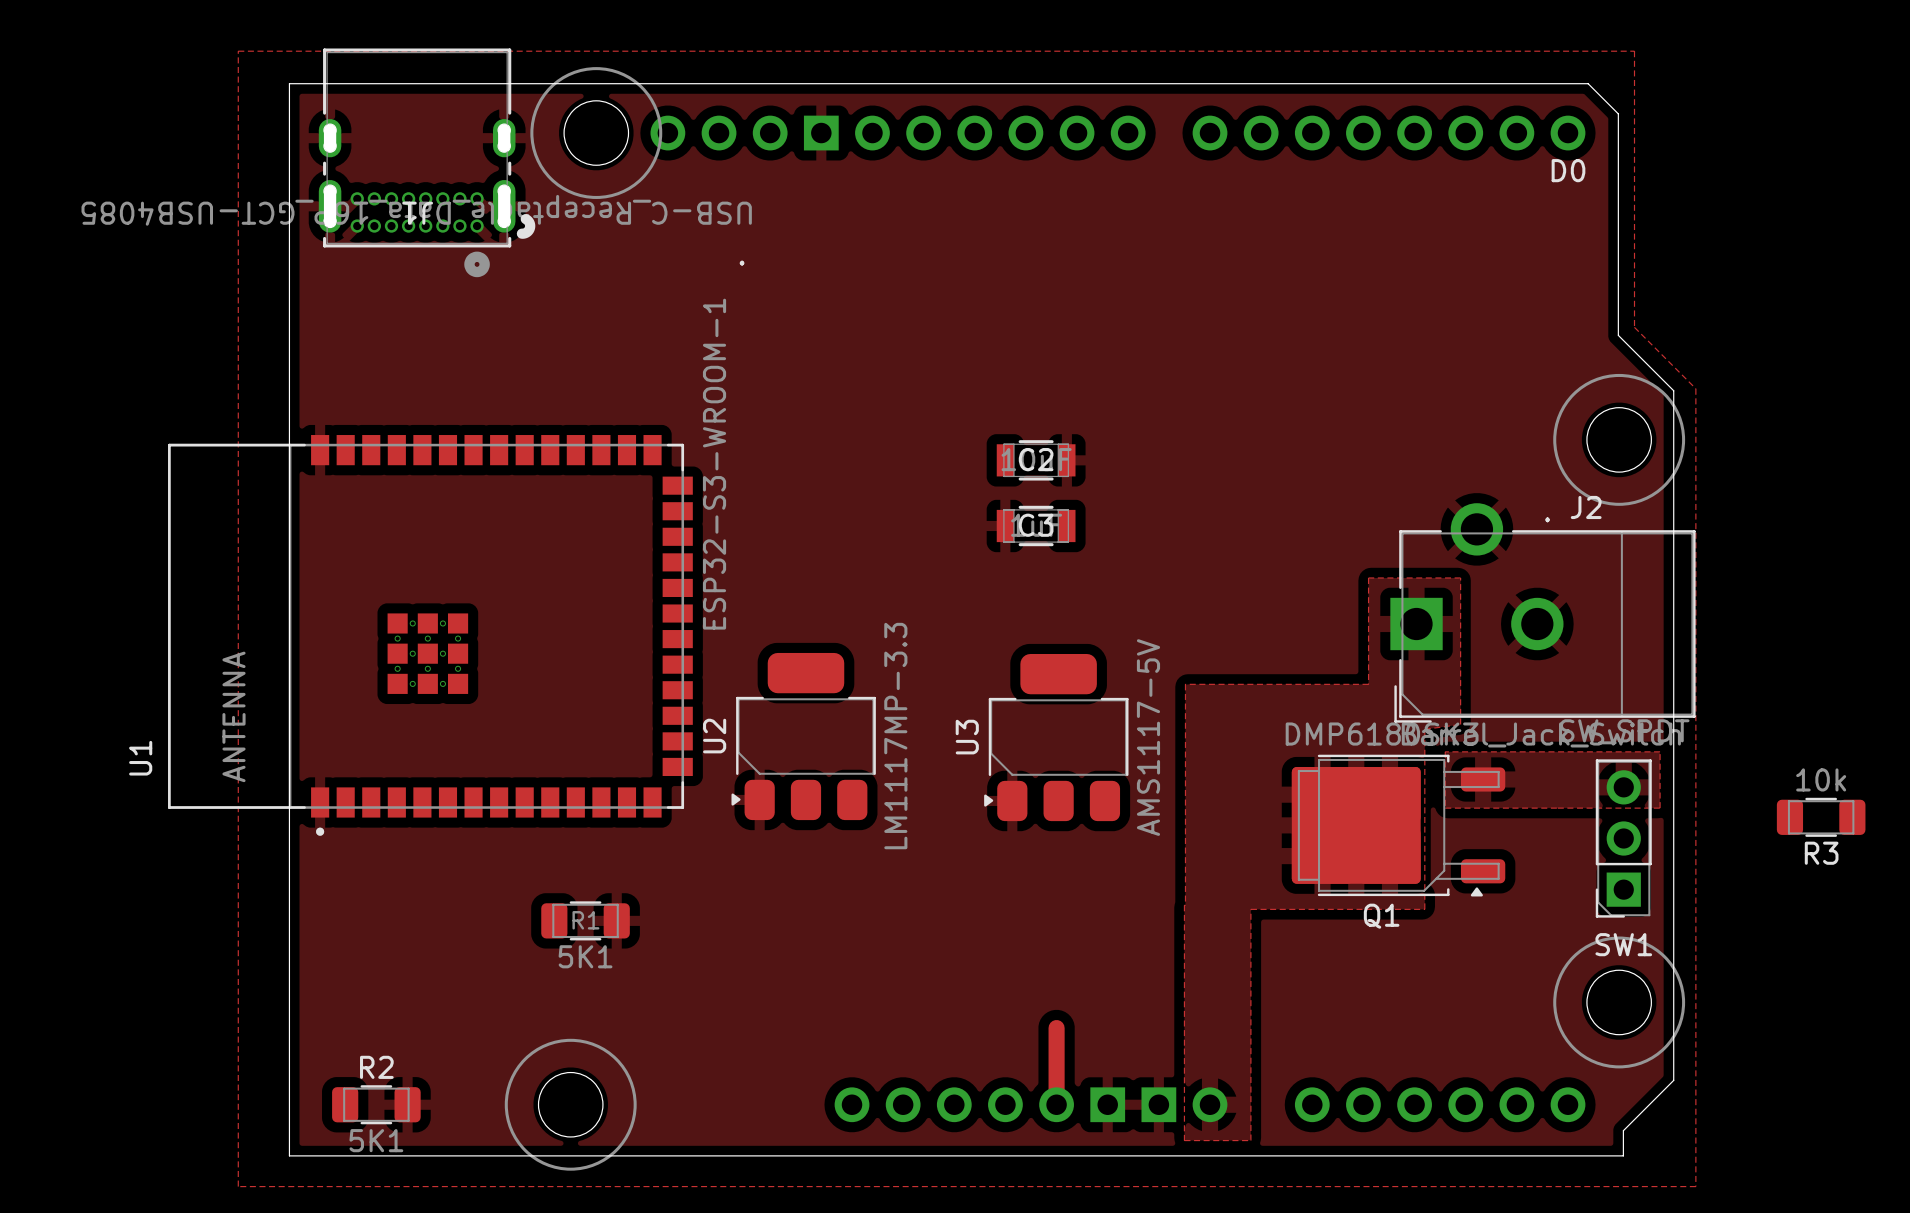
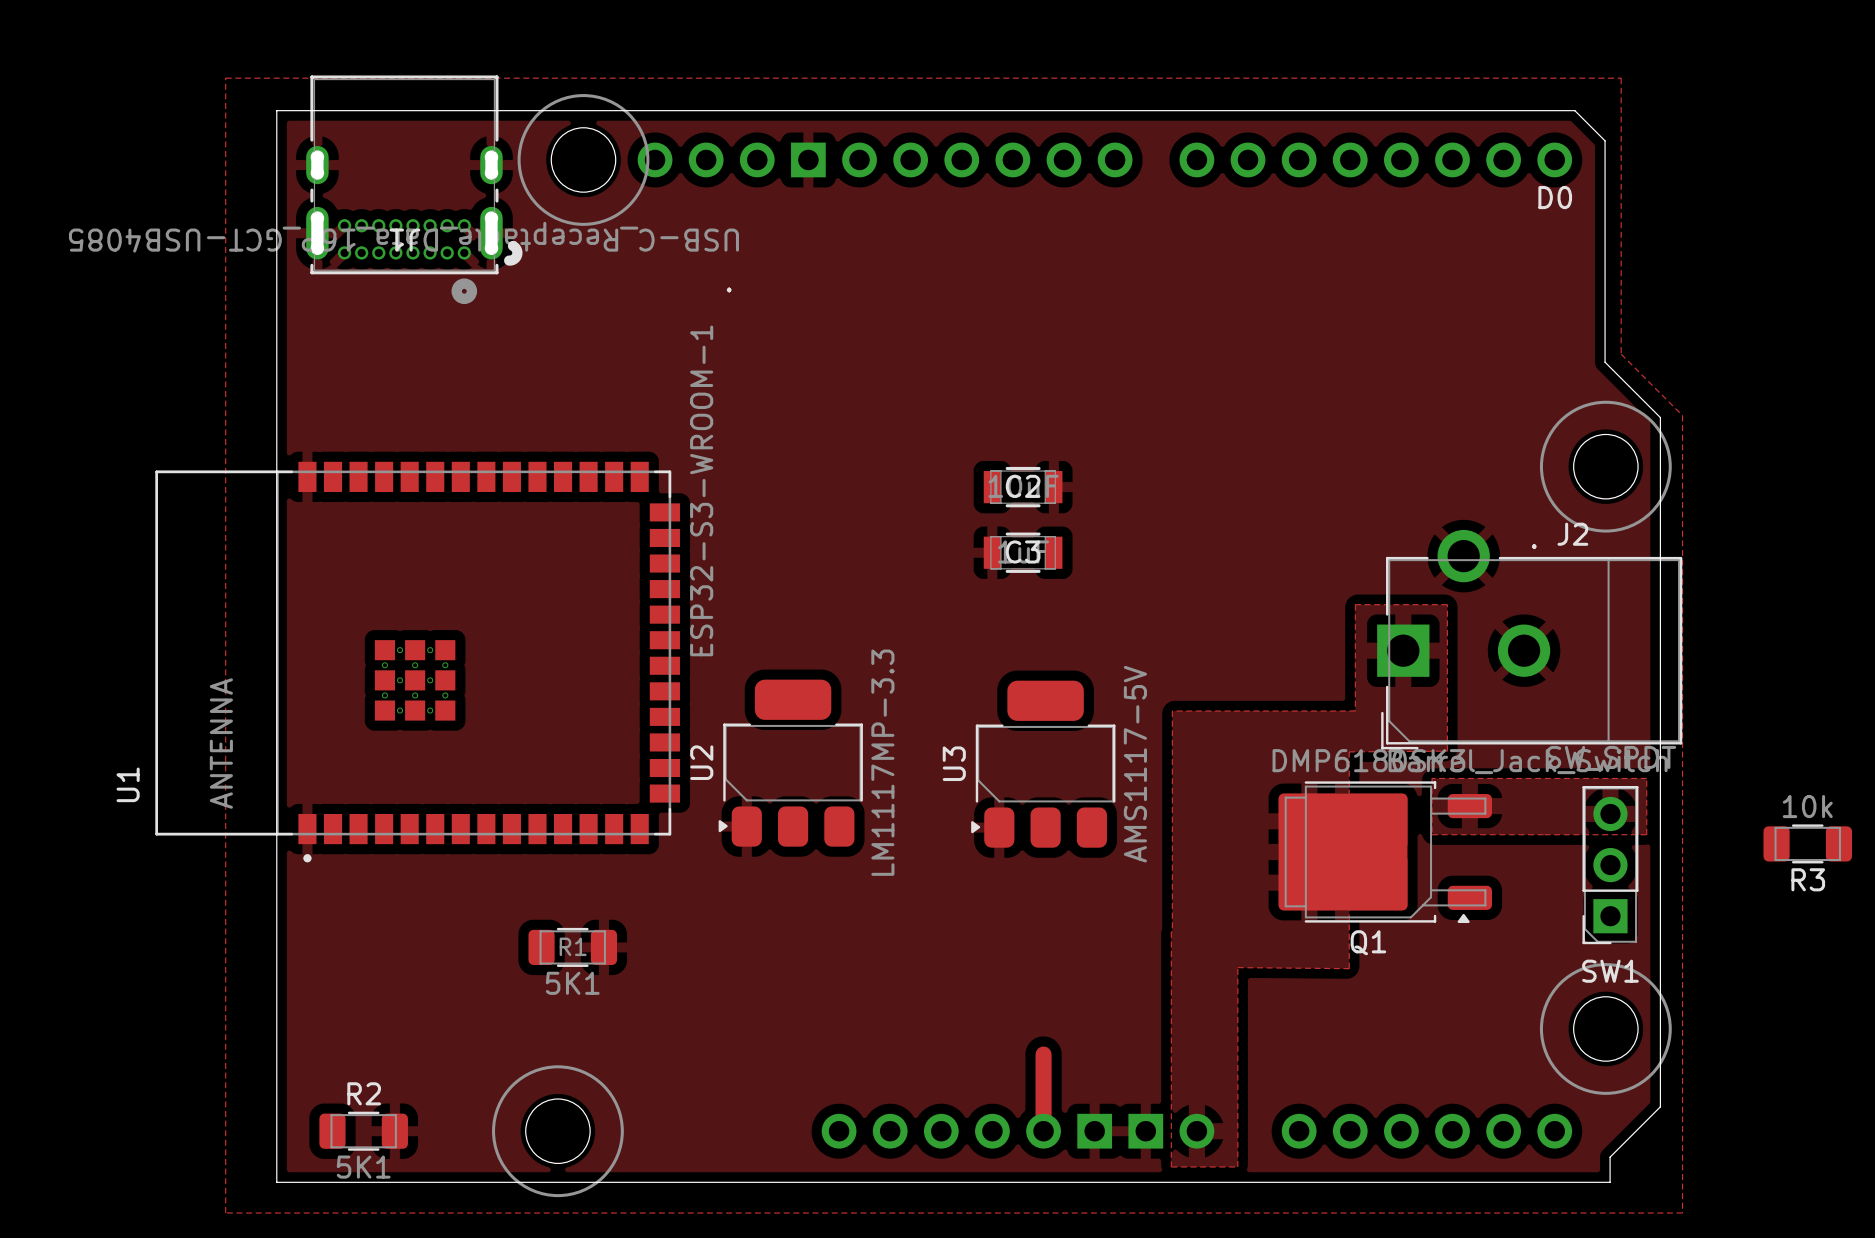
zone outline: (1460, 724) (1424, 729) (1424, 909) (1250, 909) (1250, 941) -> (1447, 751) (1349, 751) (1349, 968) (1237, 967)

